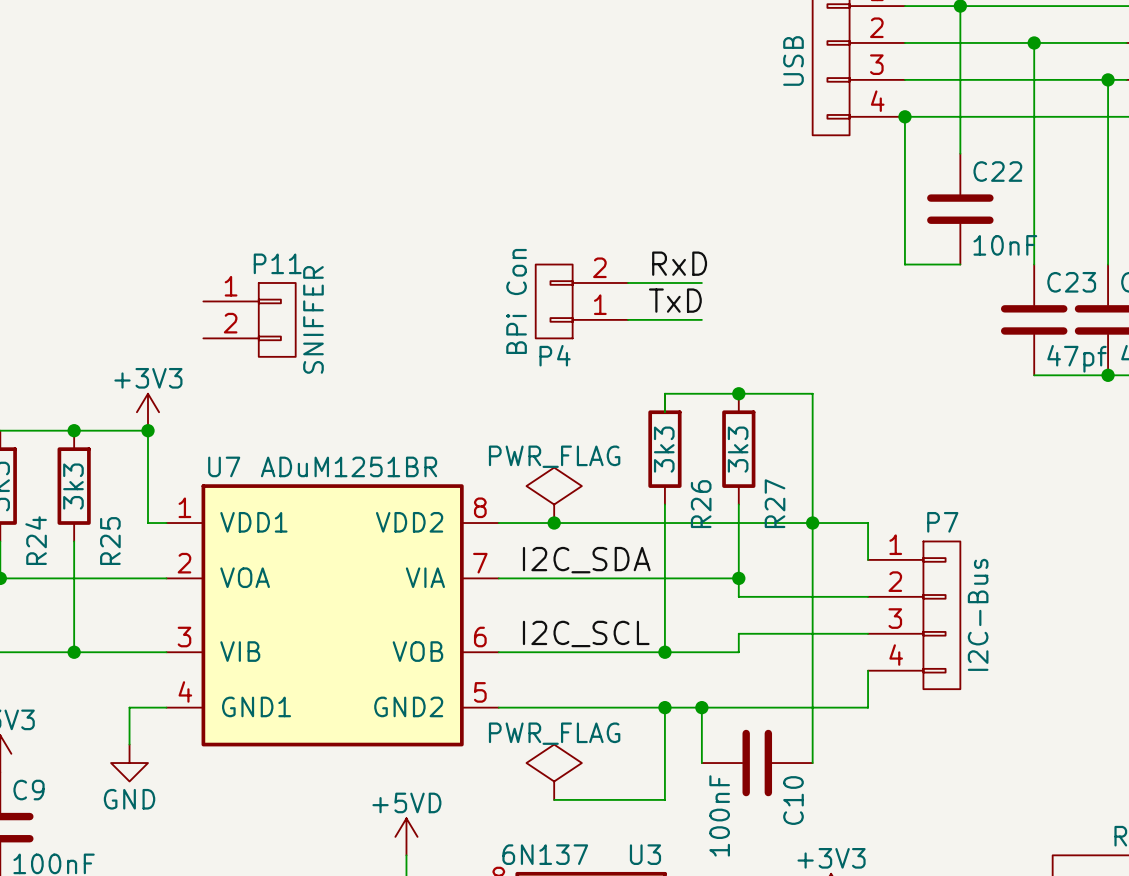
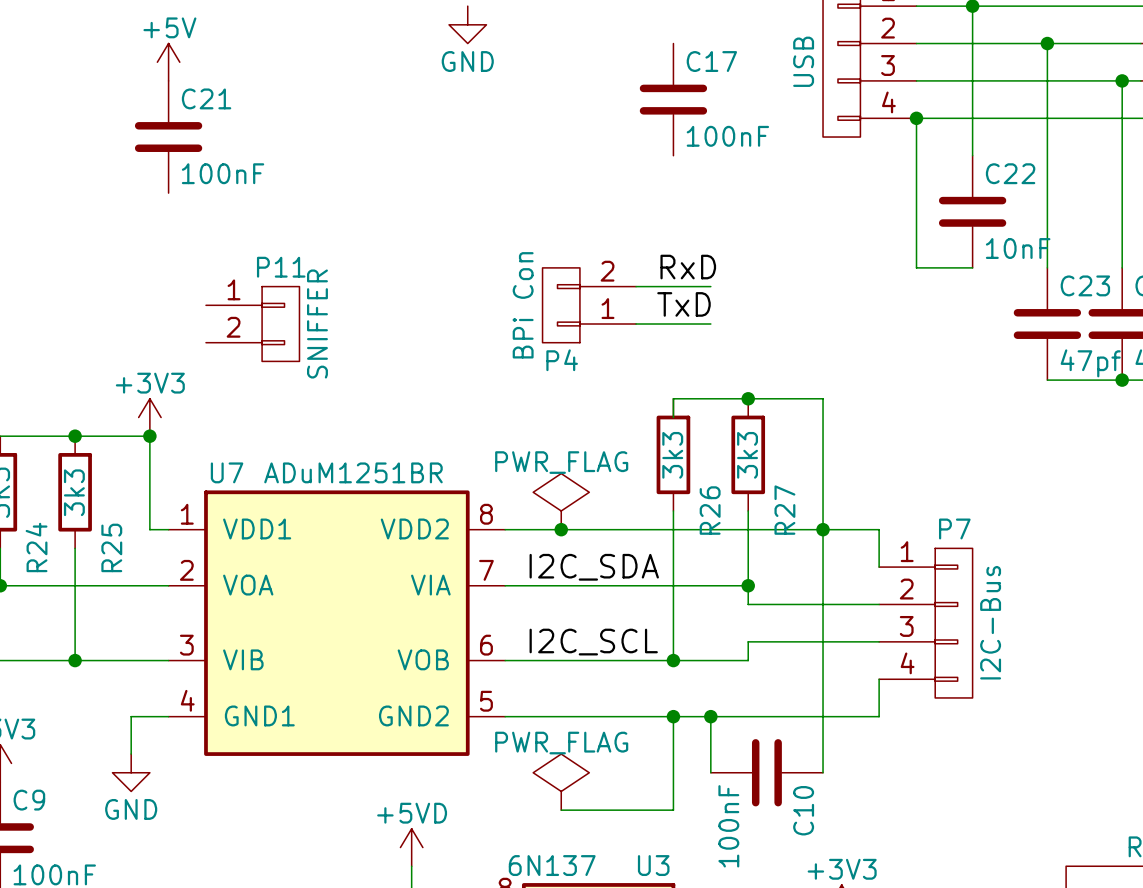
power symbol: none -> GND (467, 24)
power symbol: none -> +5V (168, 62)
C17: none -> 100nF (673, 99)
C21: none -> 100nF (168, 137)

